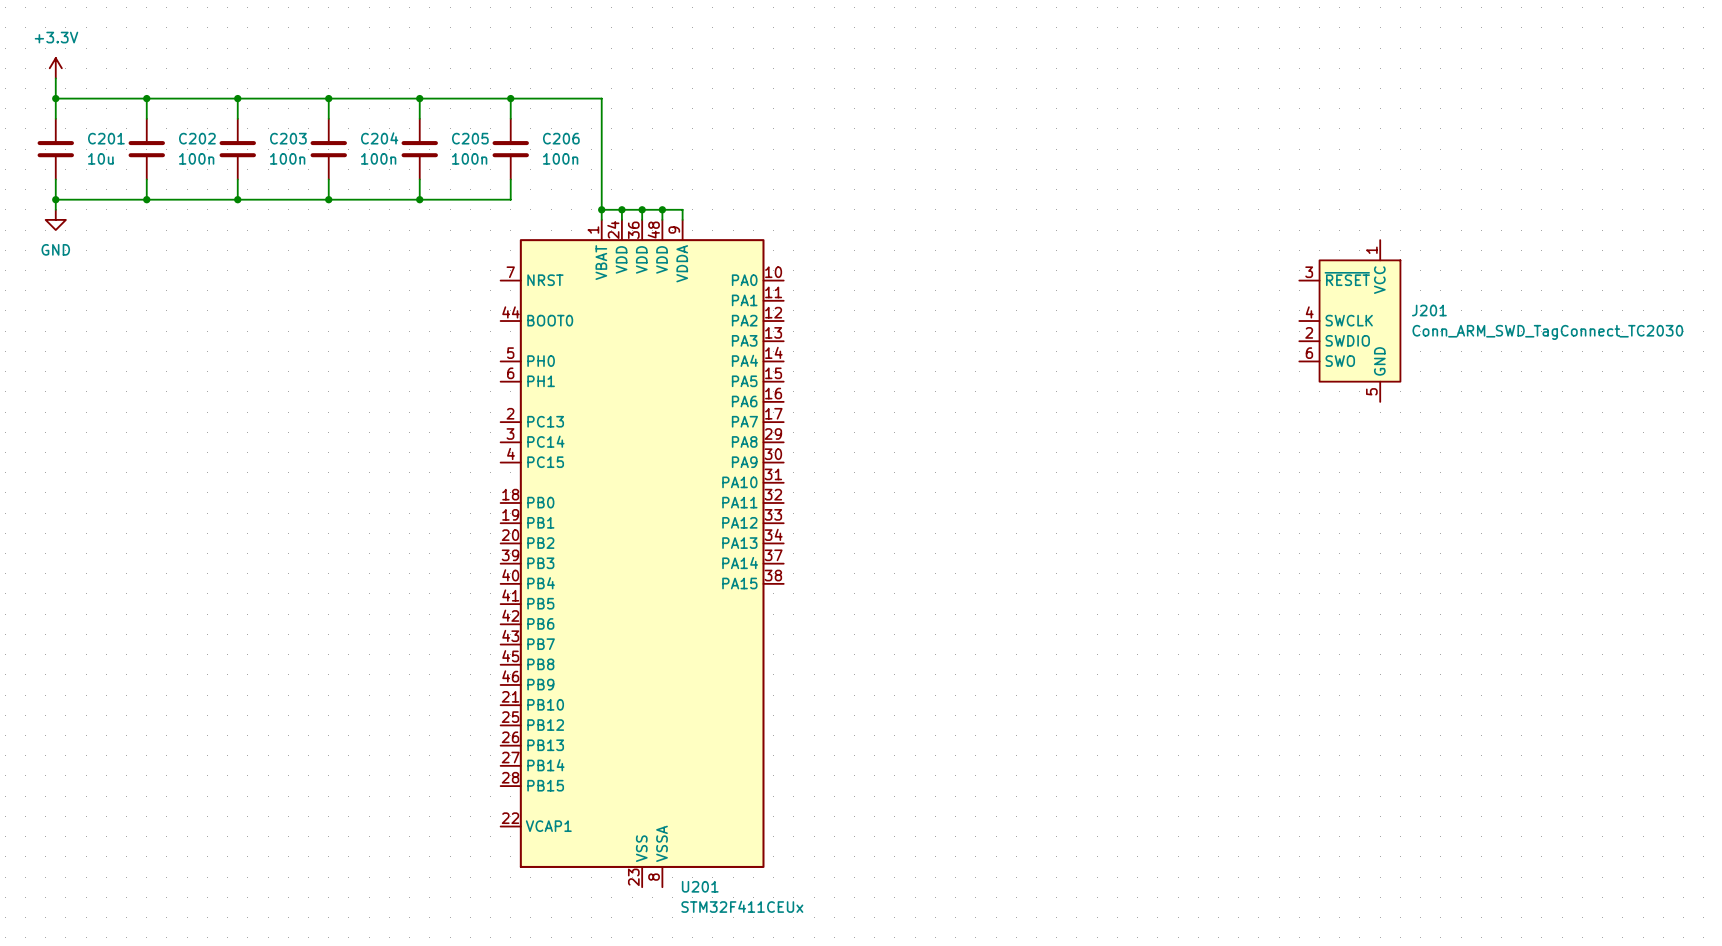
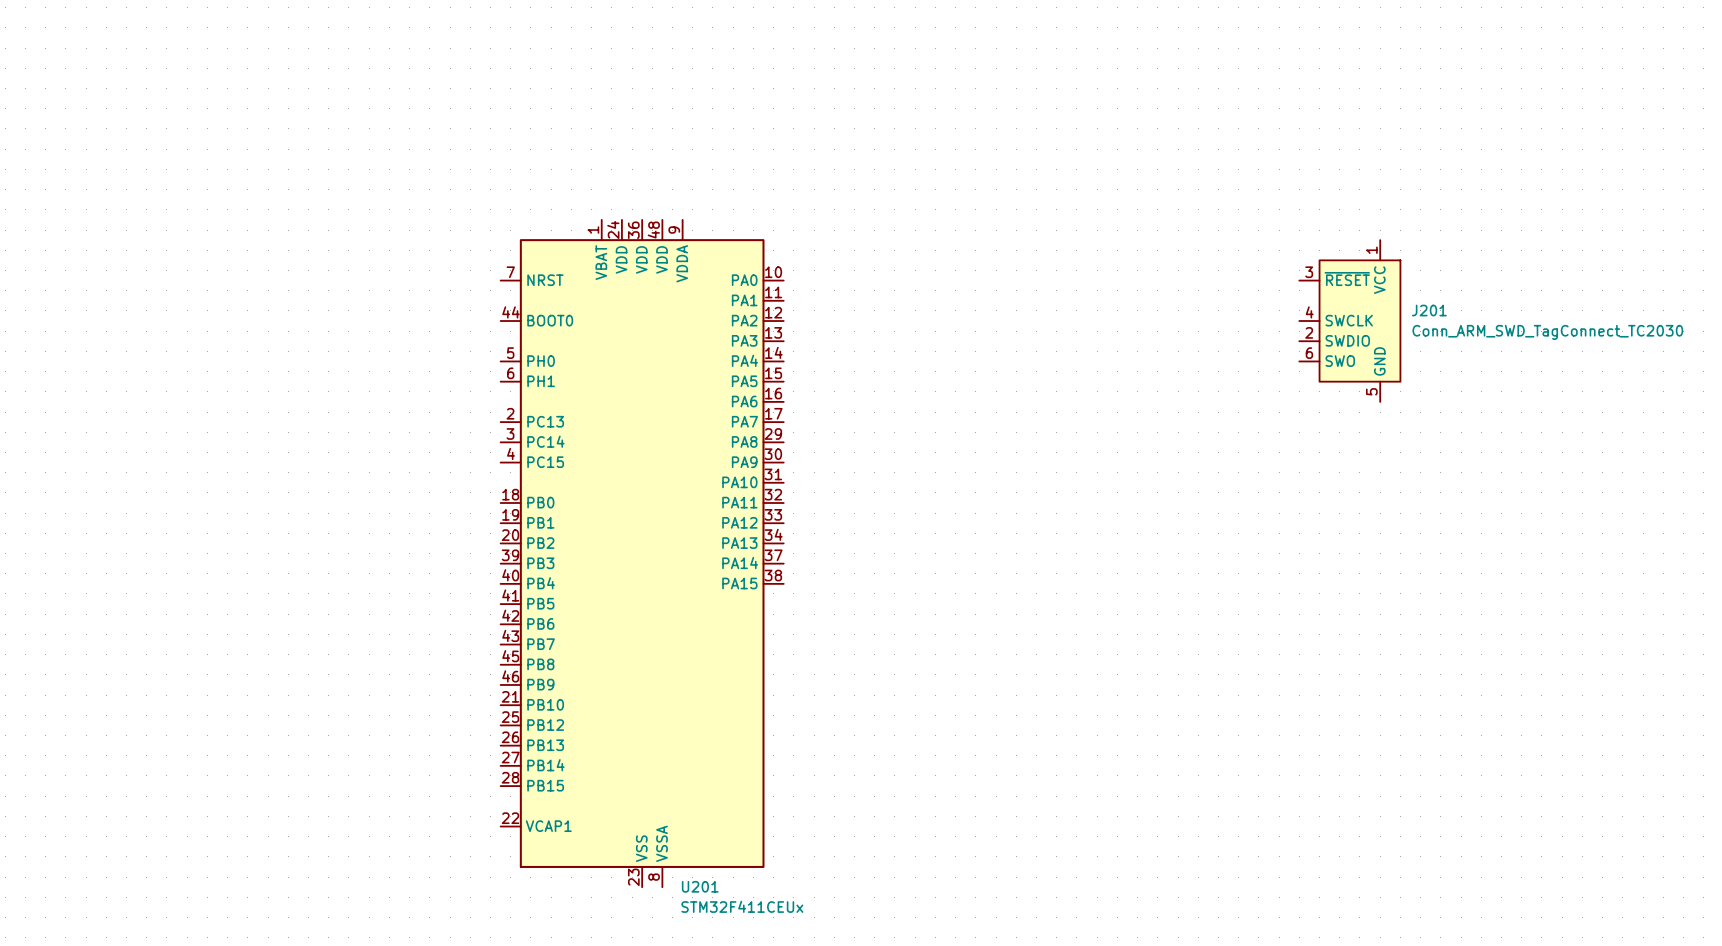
power symbol: +3.3V (55, 68) -> none
wire: (55, 78) (55, 118) -> none
wire: (55, 98) (601, 98) (601, 219) -> none
junction: (55, 98) -> none
wire: (146, 98) (146, 118) -> none
junction: (146, 98) -> none
wire: (237, 98) (237, 118) -> none
junction: (237, 98) -> none
wire: (328, 98) (328, 118) -> none
junction: (328, 98) -> none
wire: (419, 98) (419, 118) -> none
junction: (419, 98) -> none
wire: (510, 98) (510, 118) -> none
junction: (510, 98) -> none
C201: 10u (55, 149) -> none
C202: 100n (146, 149) -> none
C203: 100n (237, 149) -> none
C204: 100n (328, 149) -> none
C205: 100n (419, 149) -> none
C206: 100n (510, 149) -> none
wire: (55, 179) (55, 209) -> none
wire: (146, 179) (146, 199) -> none
wire: (237, 179) (237, 199) -> none
wire: (328, 179) (328, 199) -> none
wire: (419, 179) (419, 199) -> none
wire: (510, 179) (510, 199) (55, 199) -> none
junction: (55, 199) -> none
junction: (146, 199) -> none
junction: (237, 199) -> none
junction: (328, 199) -> none
junction: (419, 199) -> none
wire: (601, 209) (682, 209) (682, 219) -> none
junction: (601, 209) -> none
wire: (621, 209) (621, 219) -> none
junction: (621, 209) -> none
wire: (642, 209) (642, 219) -> none
junction: (642, 209) -> none
wire: (662, 209) (662, 219) -> none
junction: (662, 209) -> none
power symbol: GND (55, 219) -> none

